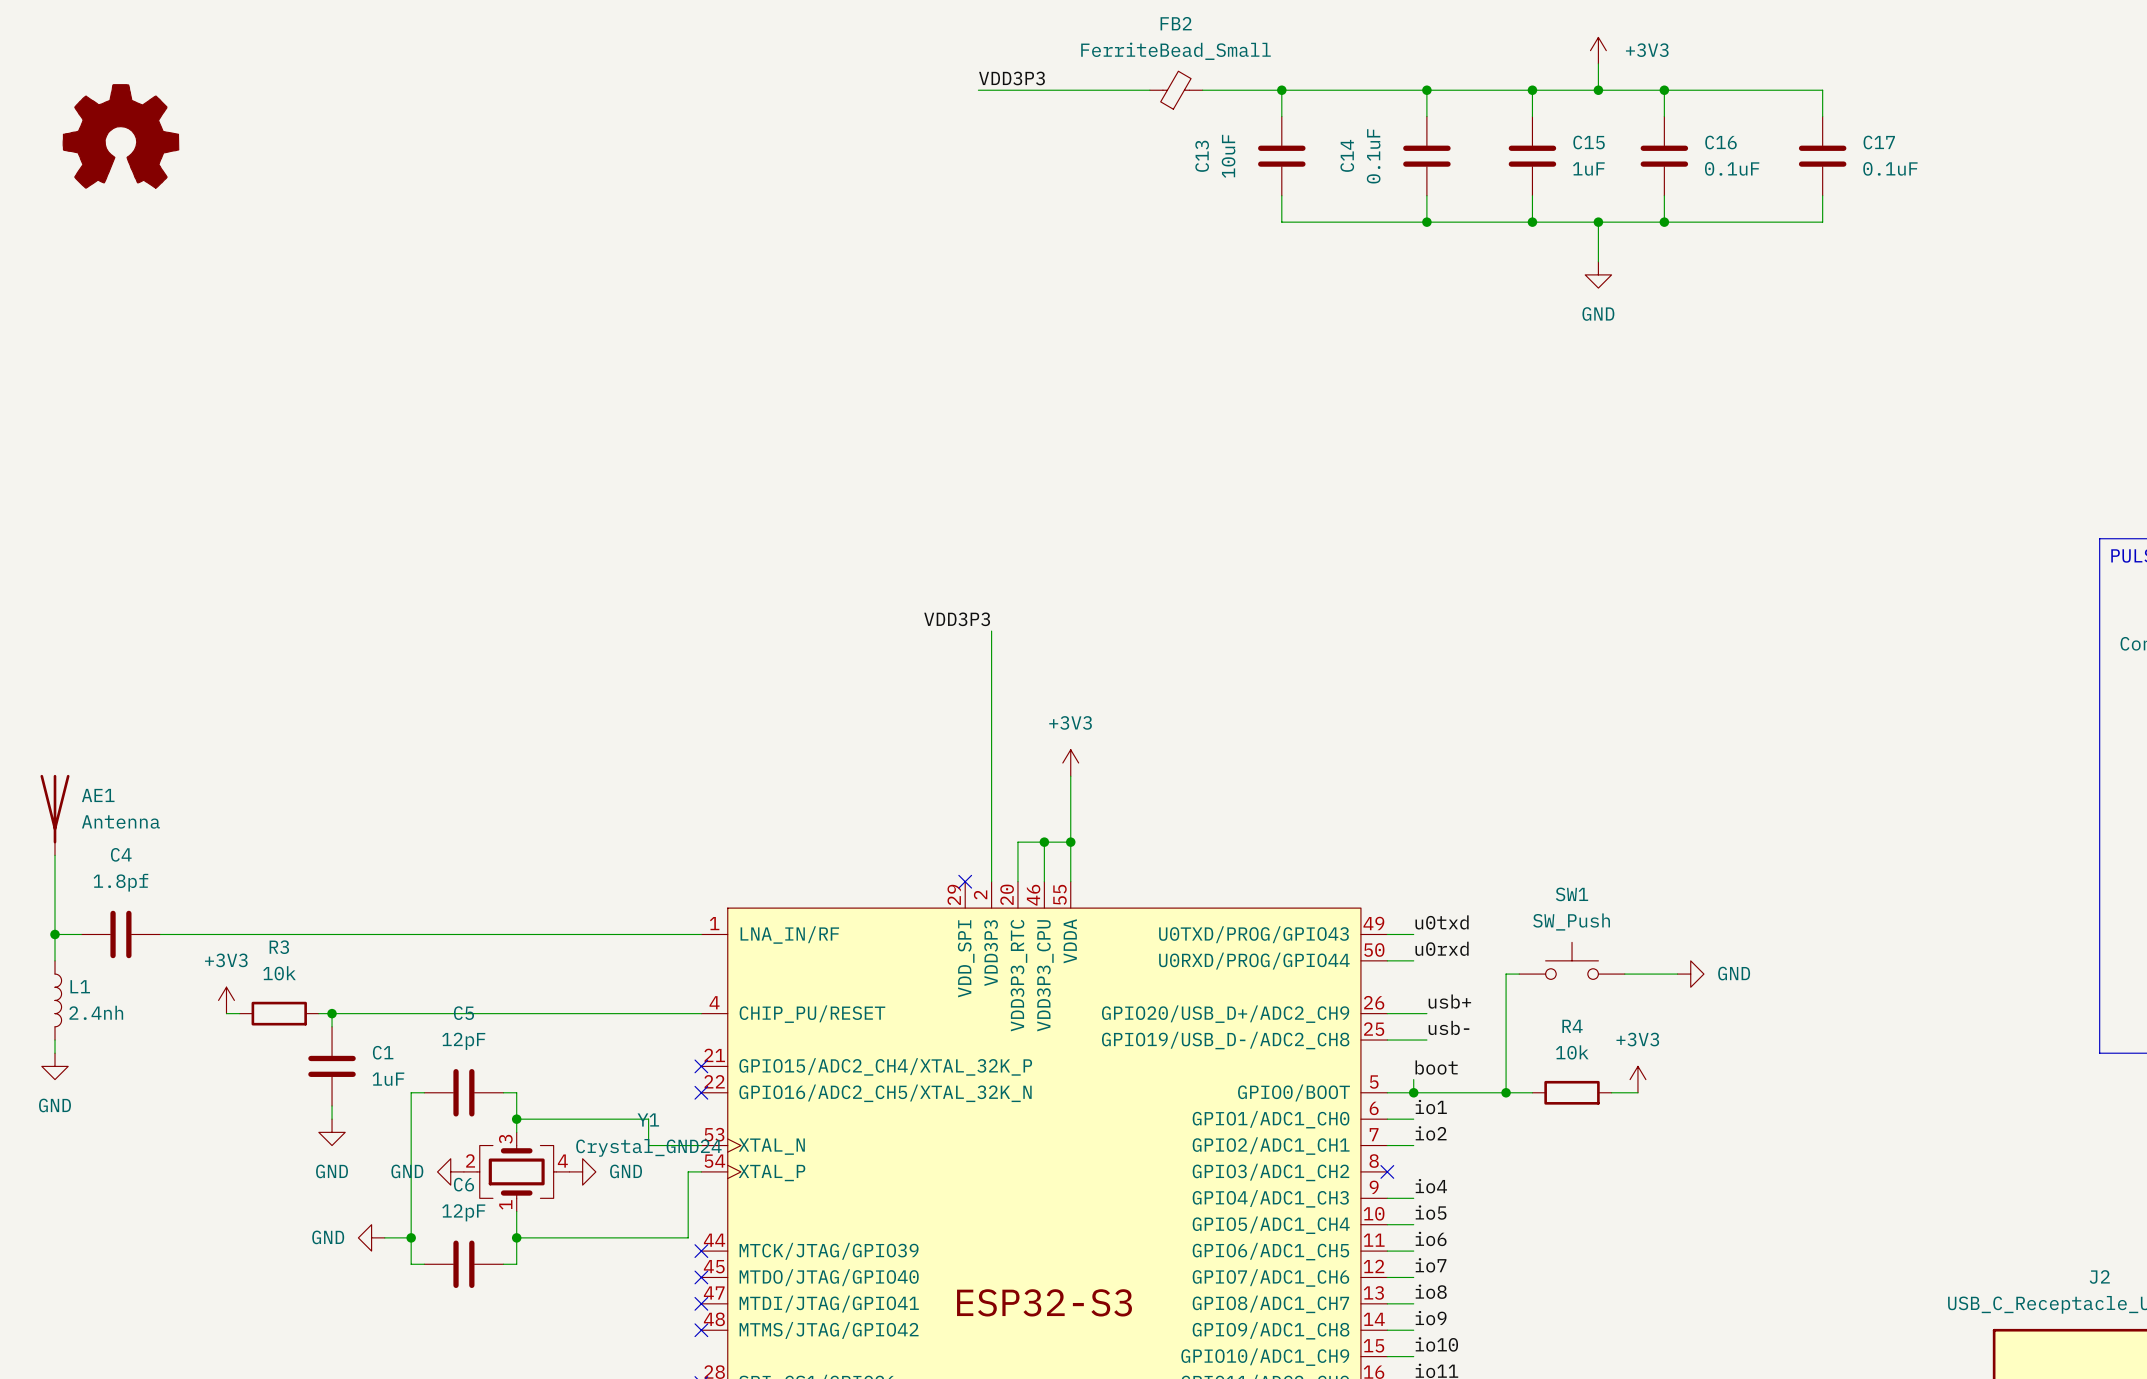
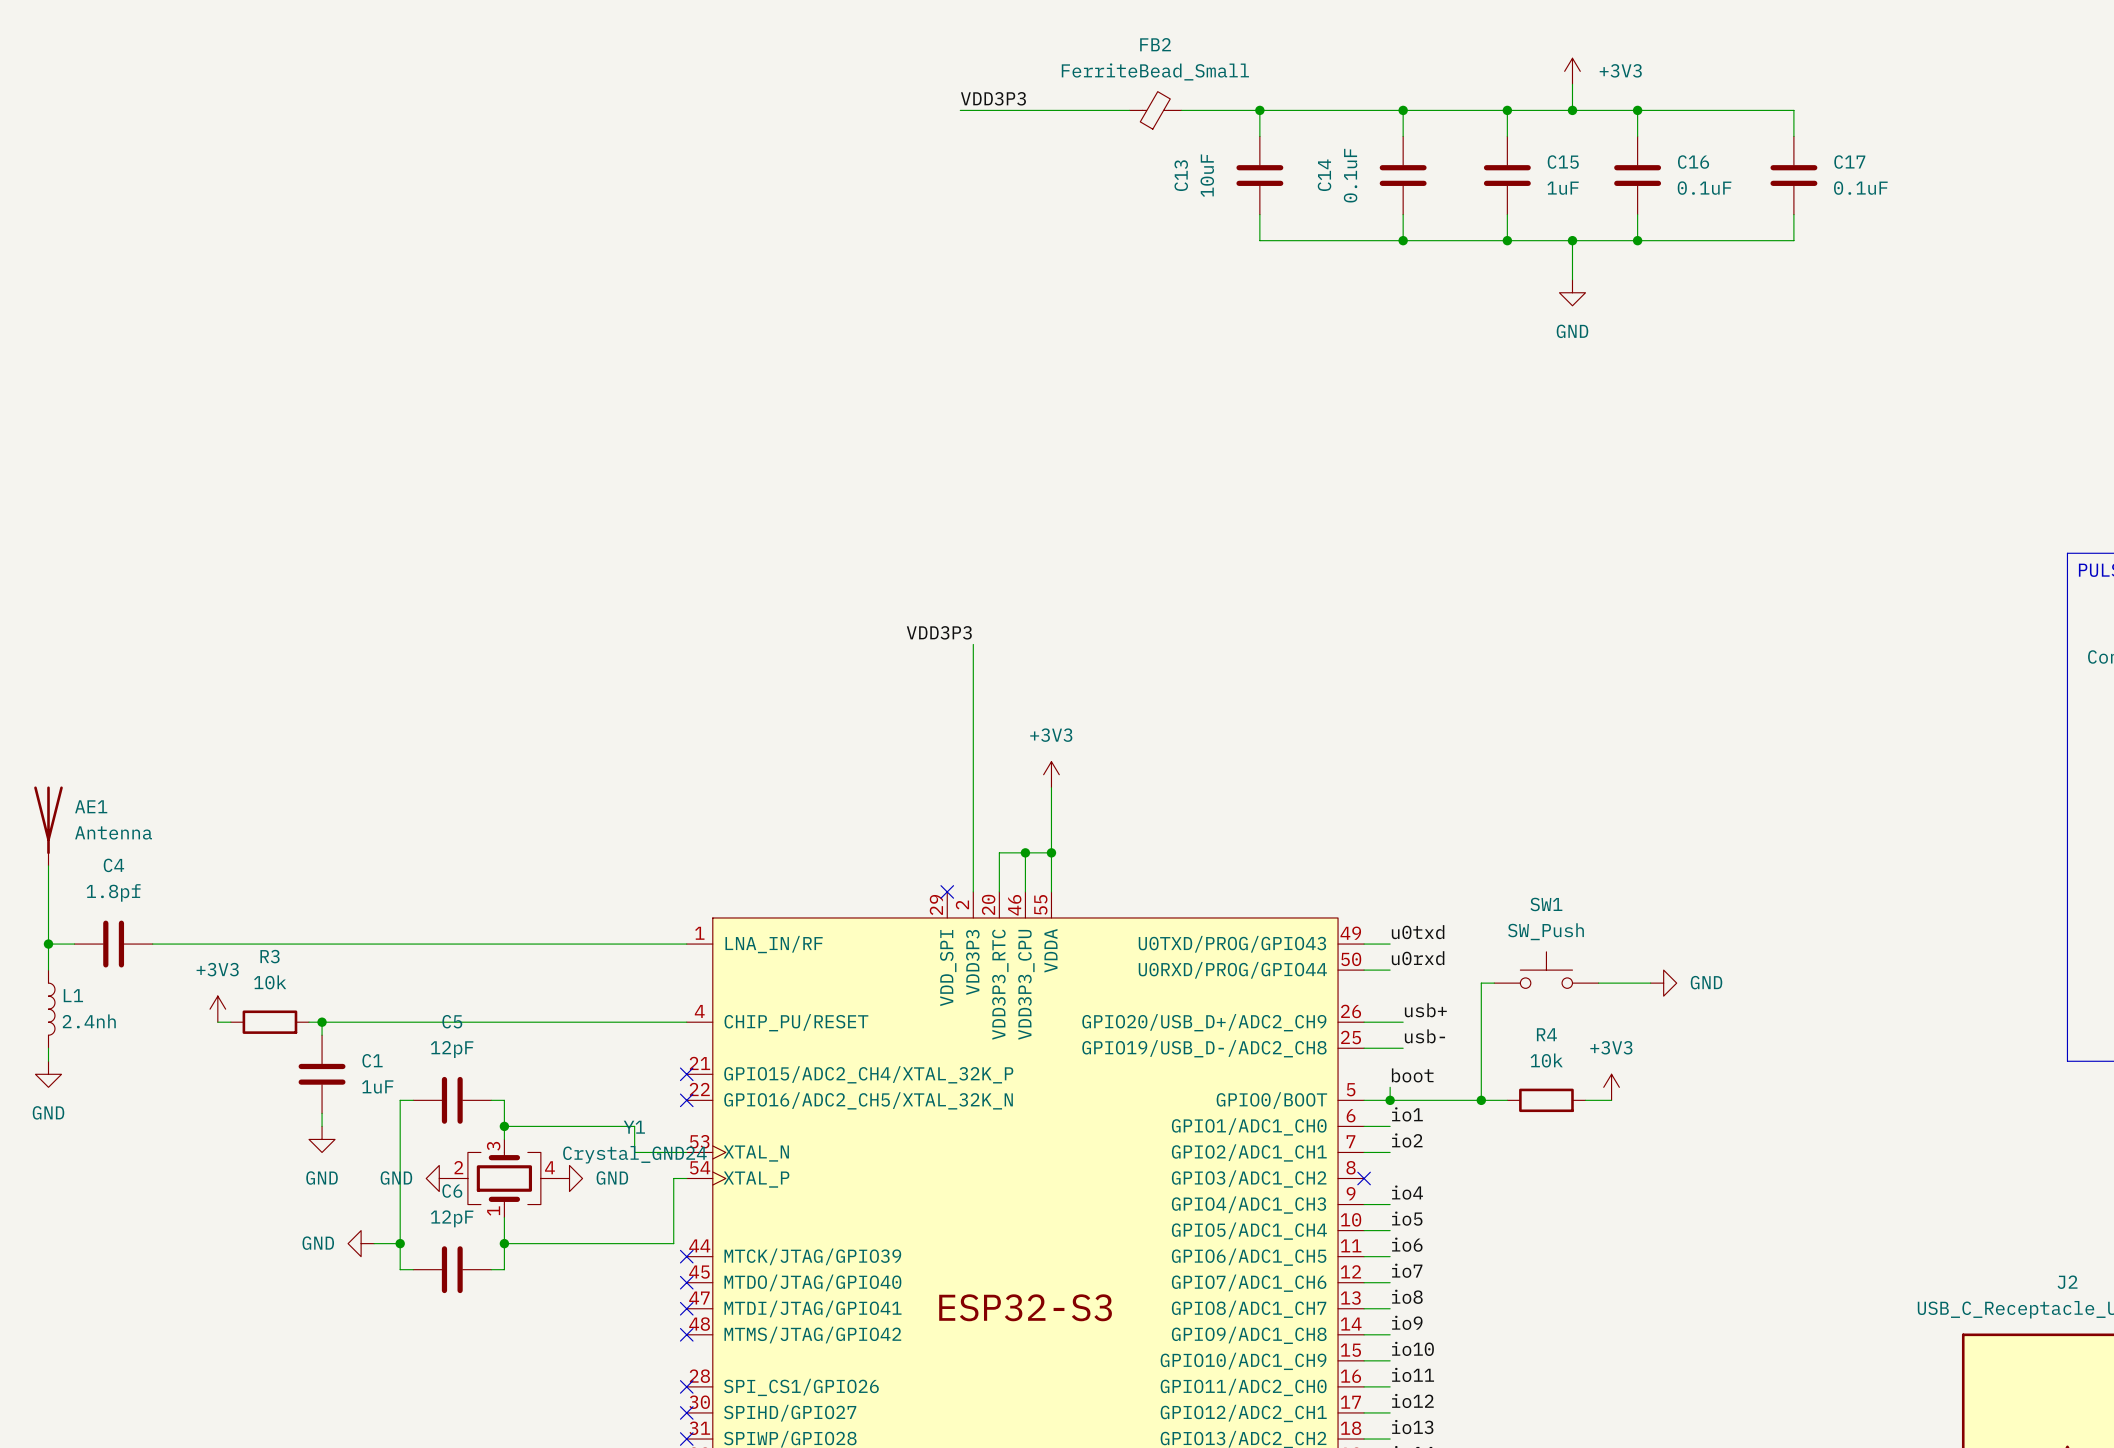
power symbol: (120, 136) -> none

